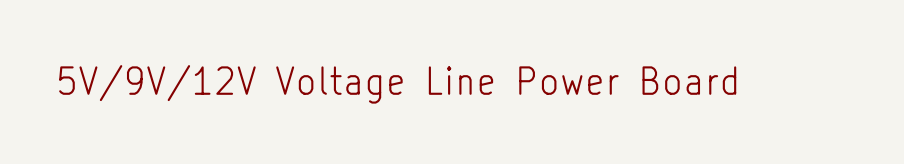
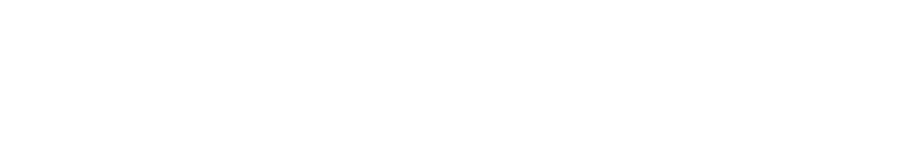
text: 5V/9V/12V Voltage Line Power Board (397, 84) -> none

